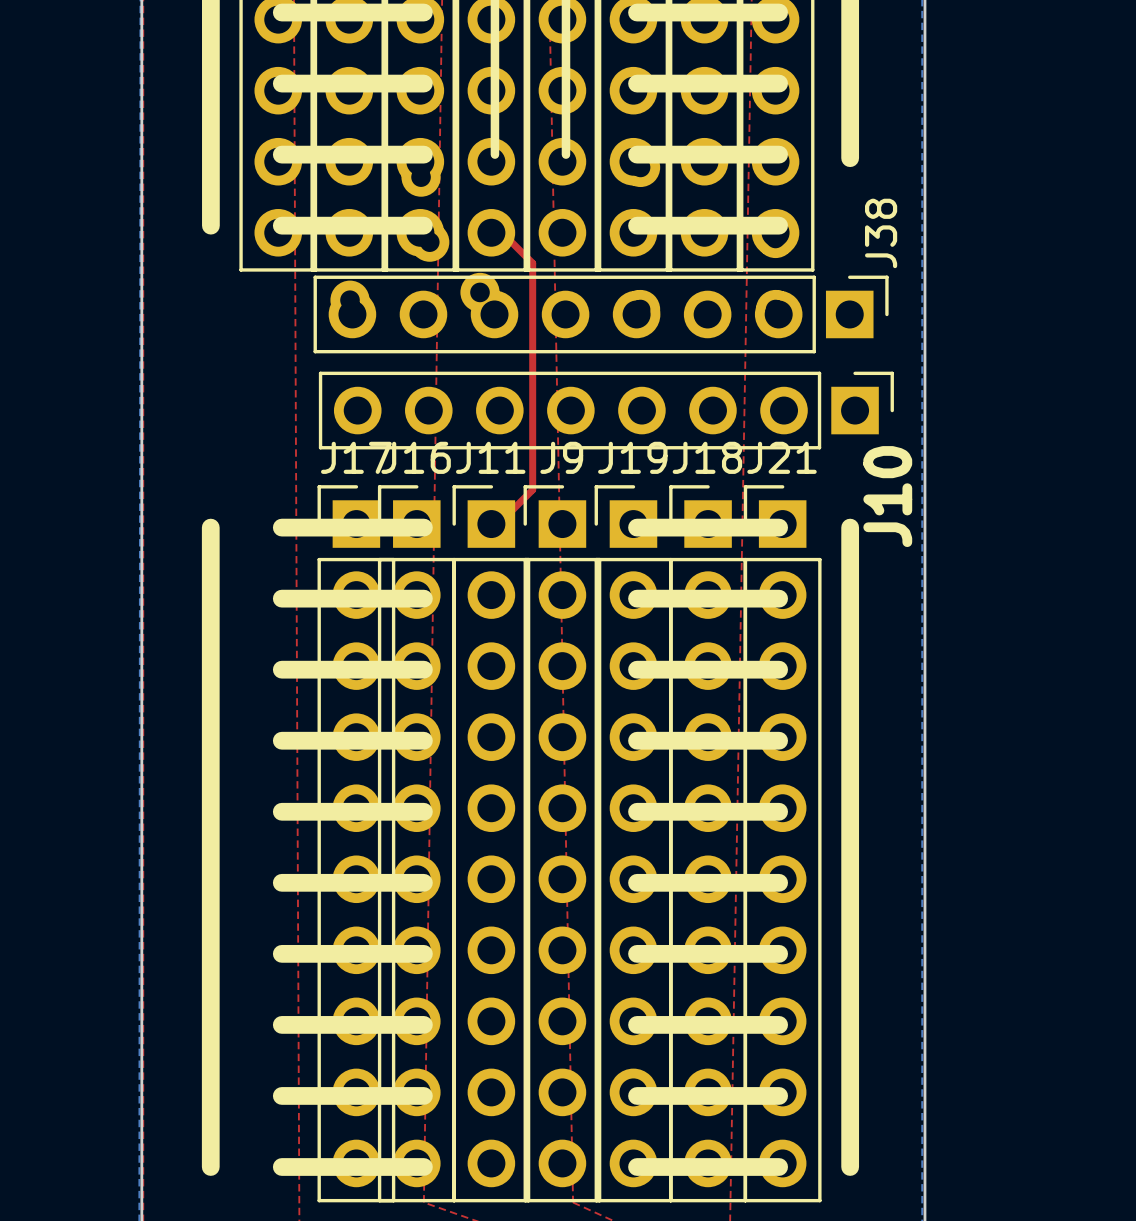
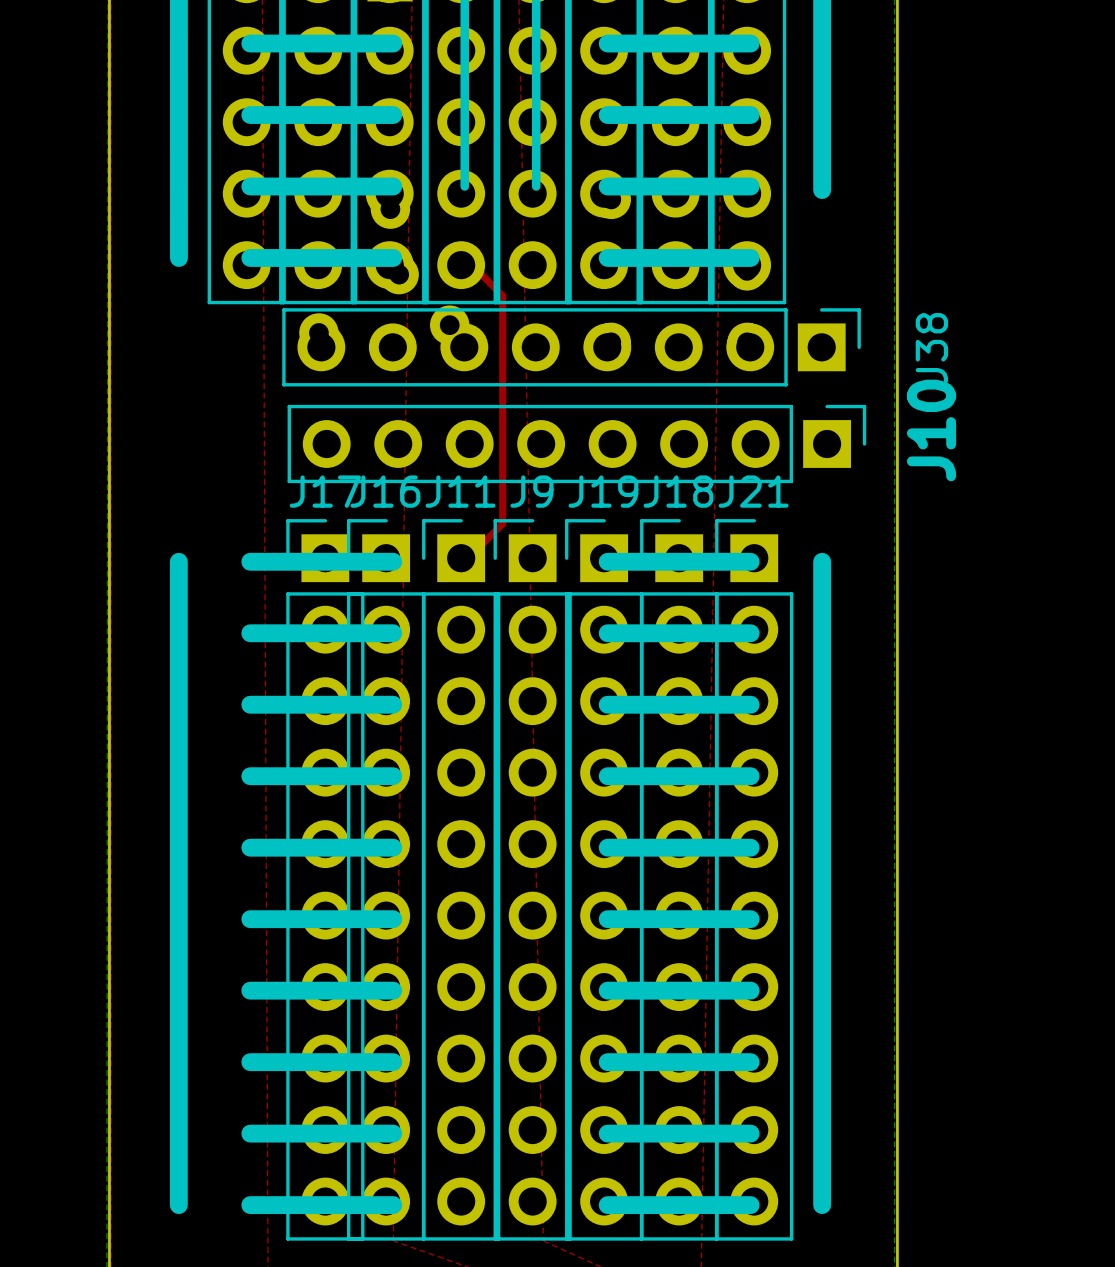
J38 name position: J38 (881, 233) -> J38 (931, 348)
J10 name position: J10 (887, 496) -> J10 (931, 430)

